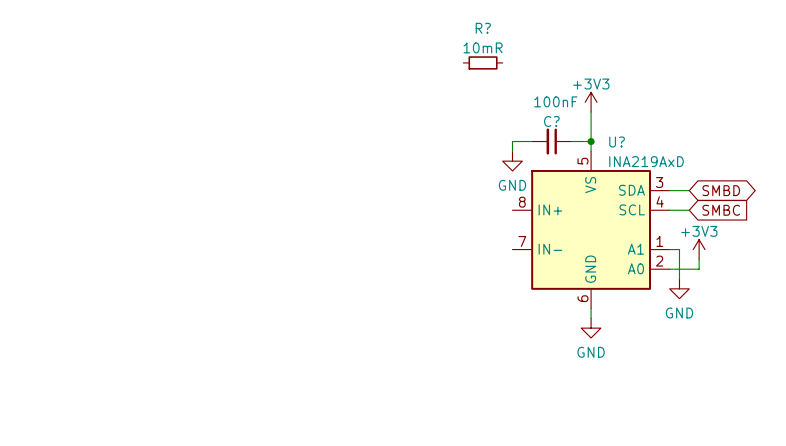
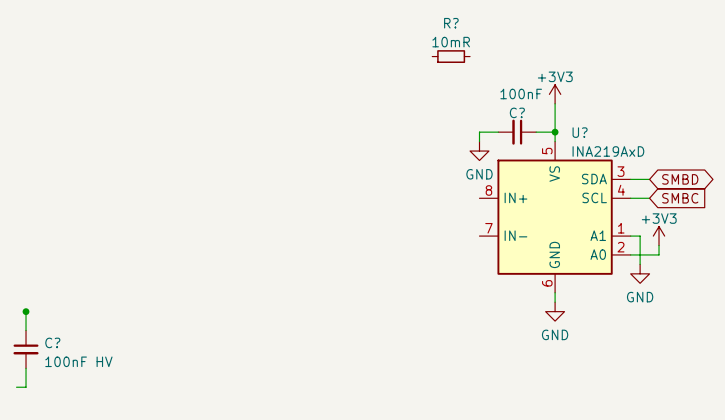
wire: none -> (26, 311) (26, 330)
junction: none -> (26, 311)
C?: none -> 100nF HV (26, 349)
wire: none -> (26, 368) (26, 387) (16, 387)

